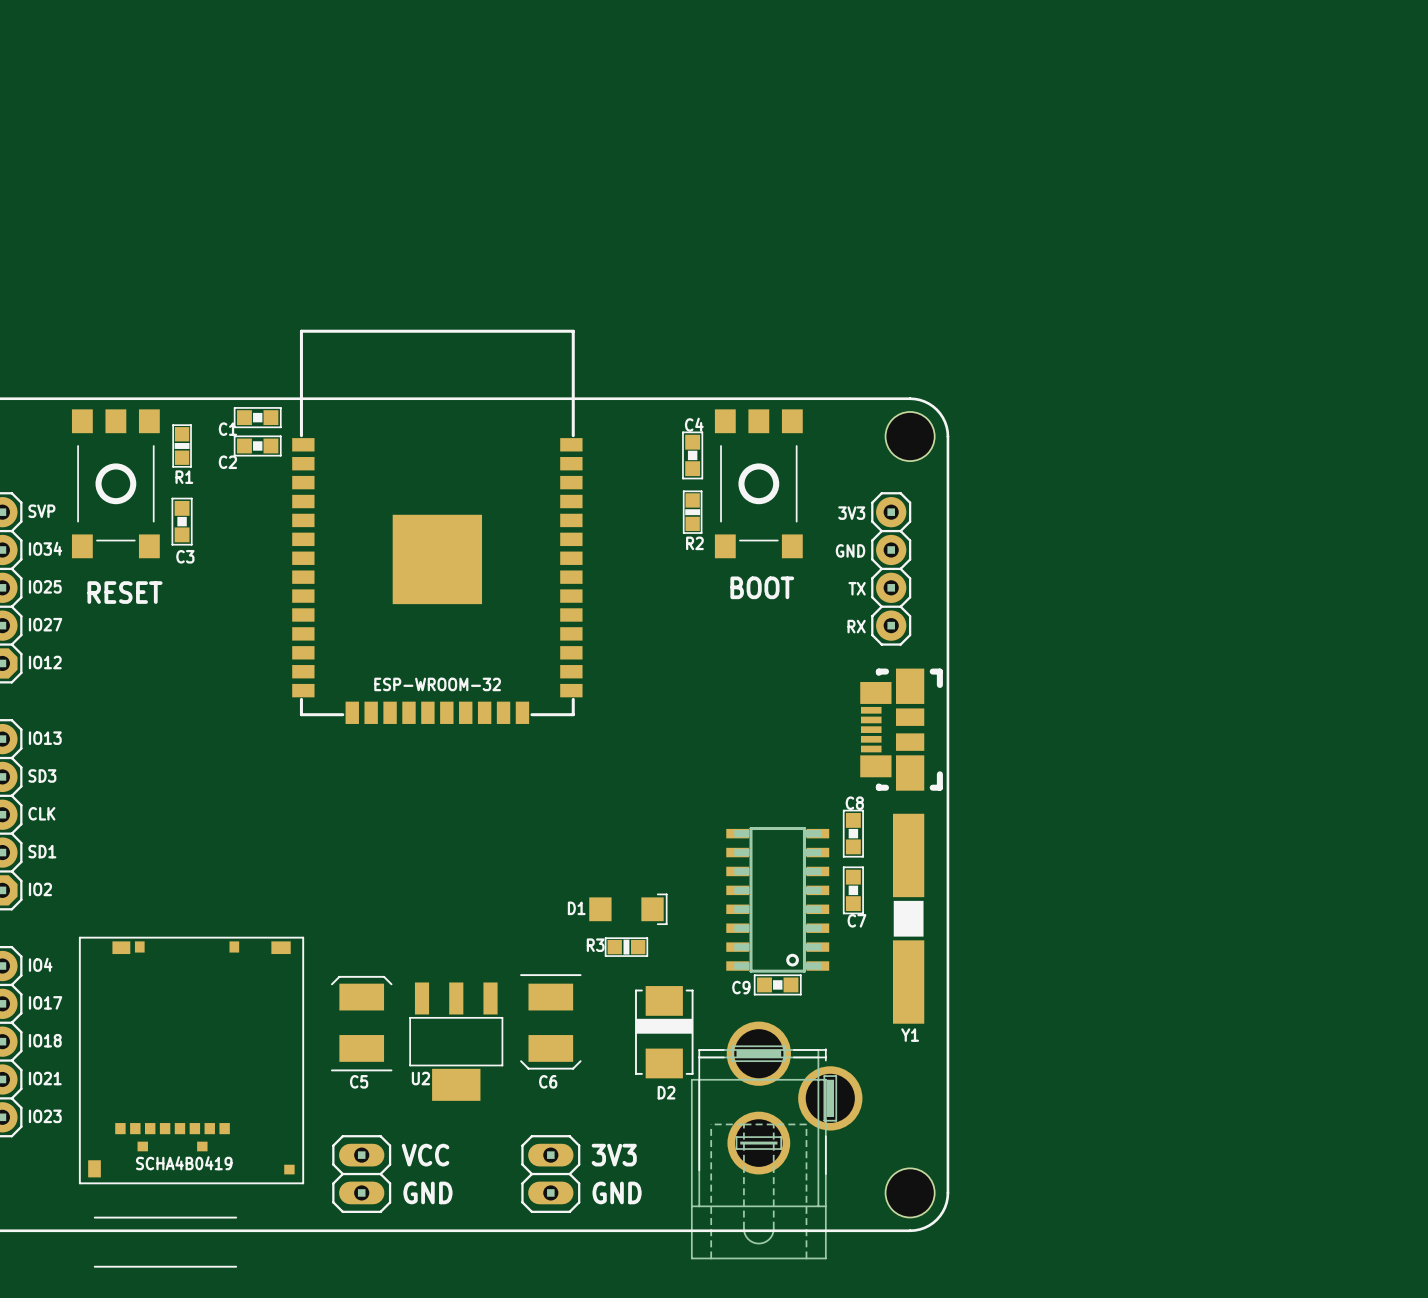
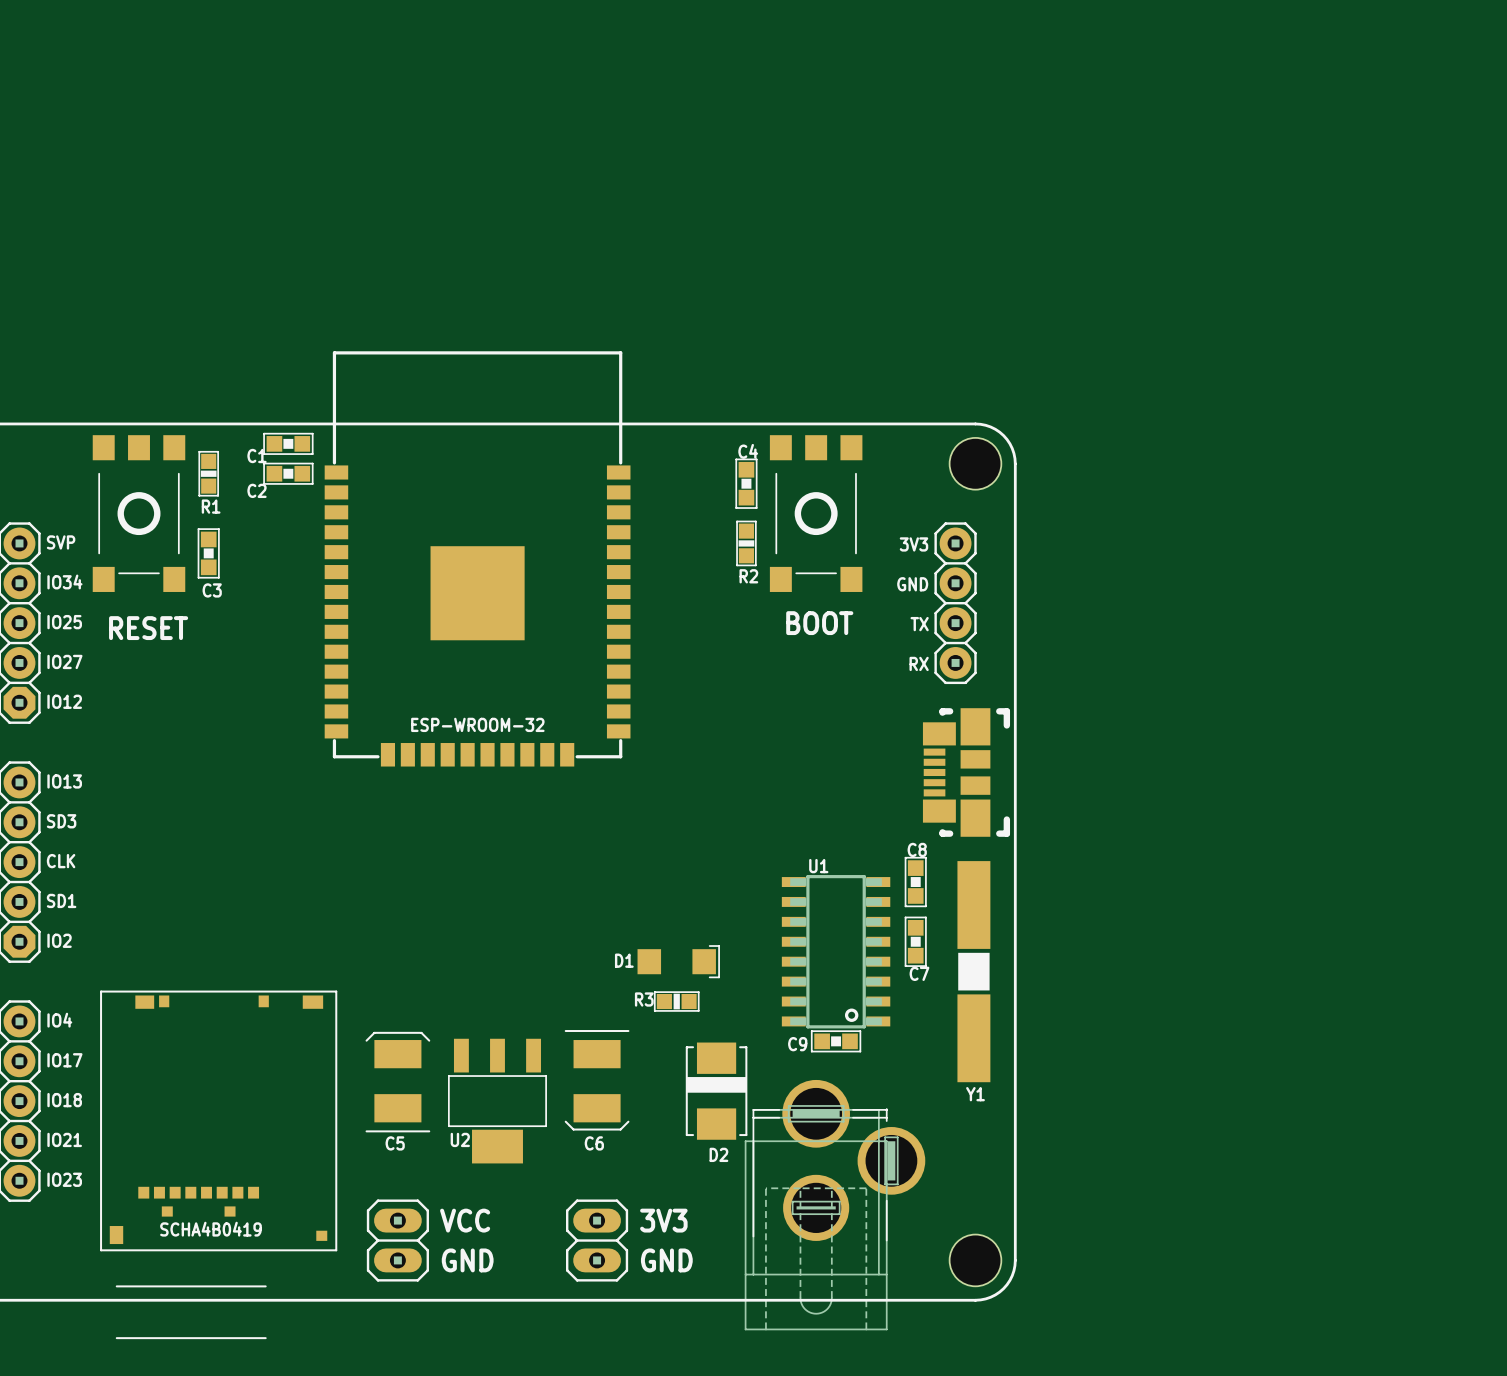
text: none -> U1 (818, 866)

